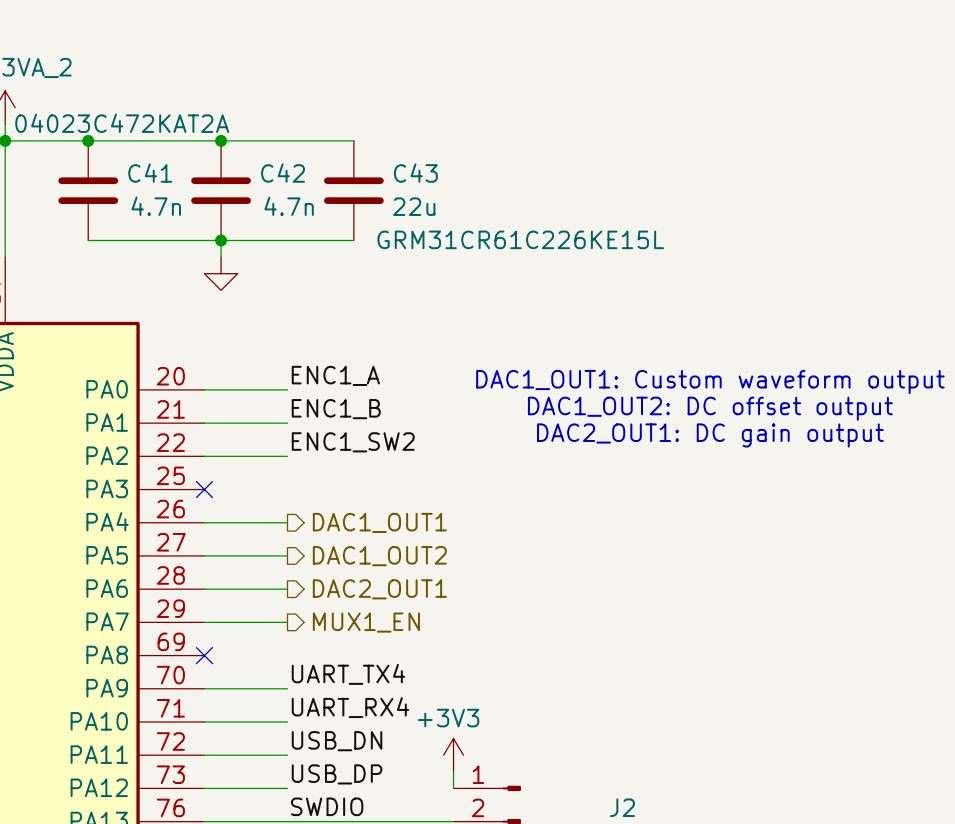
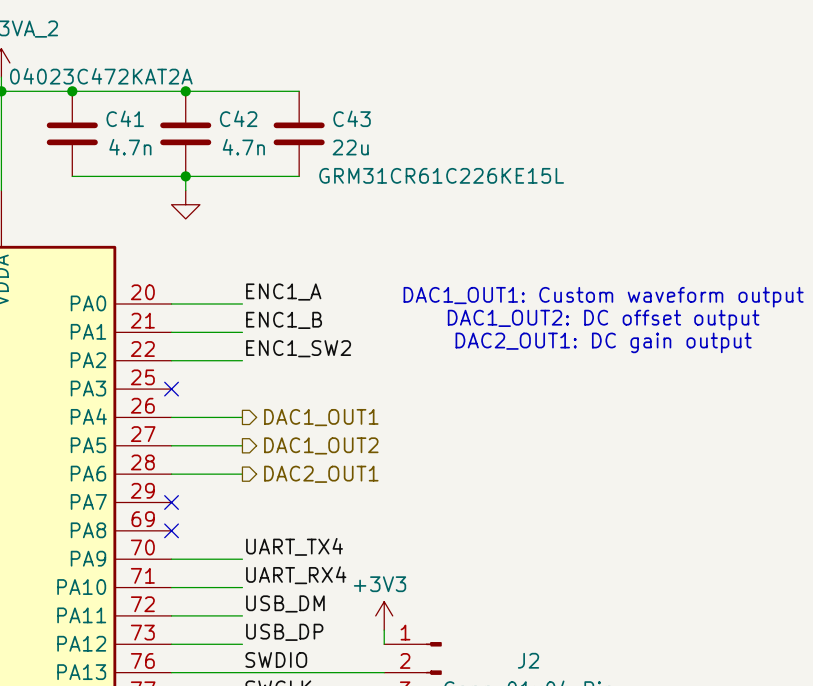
wire: (204, 622) (287, 622) -> none
no-connect mark: none -> (171, 502)
hierarchical label: MUX1_EN (366, 622) -> none
label: USB_DN (337, 741) -> USB_DM (285, 603)

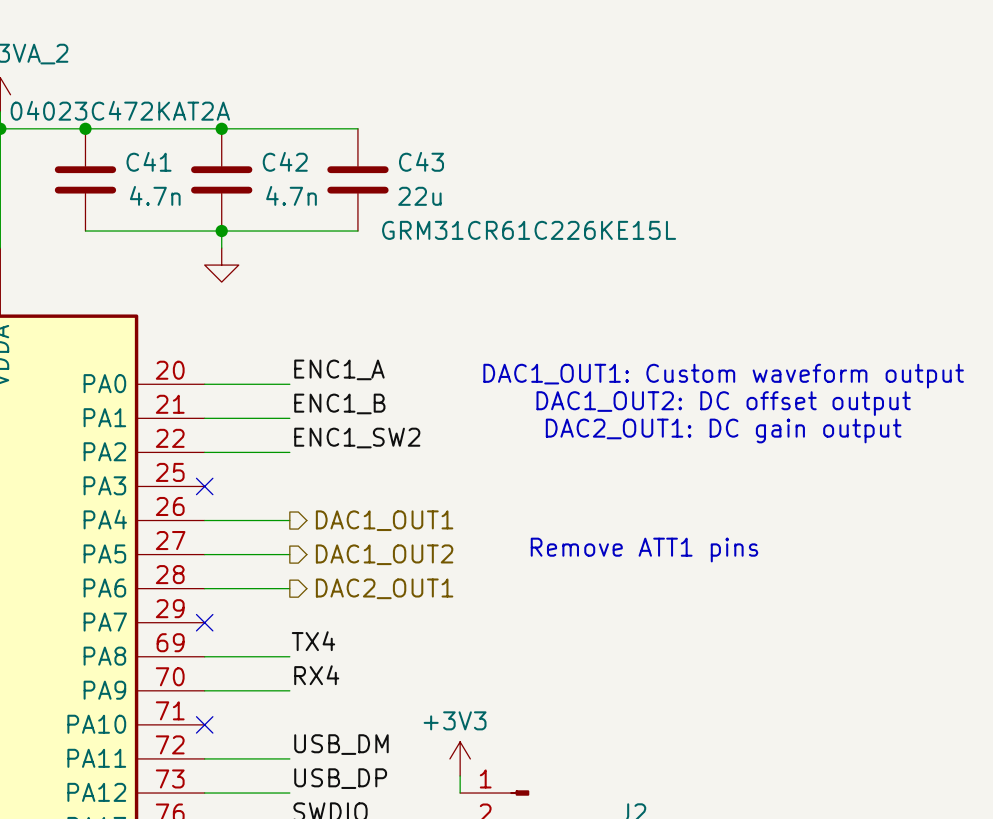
text: none -> Remove ATT1 pins (644, 550)
label: none -> TX4 (313, 641)
no-connect mark position: (171, 530) -> (204, 724)
label: UART_TX4 (294, 546) -> RX4 (316, 675)
label: UART_RX4 (296, 575) -> none
wire: (171, 587) (242, 587) -> (204, 656) (289, 656)

